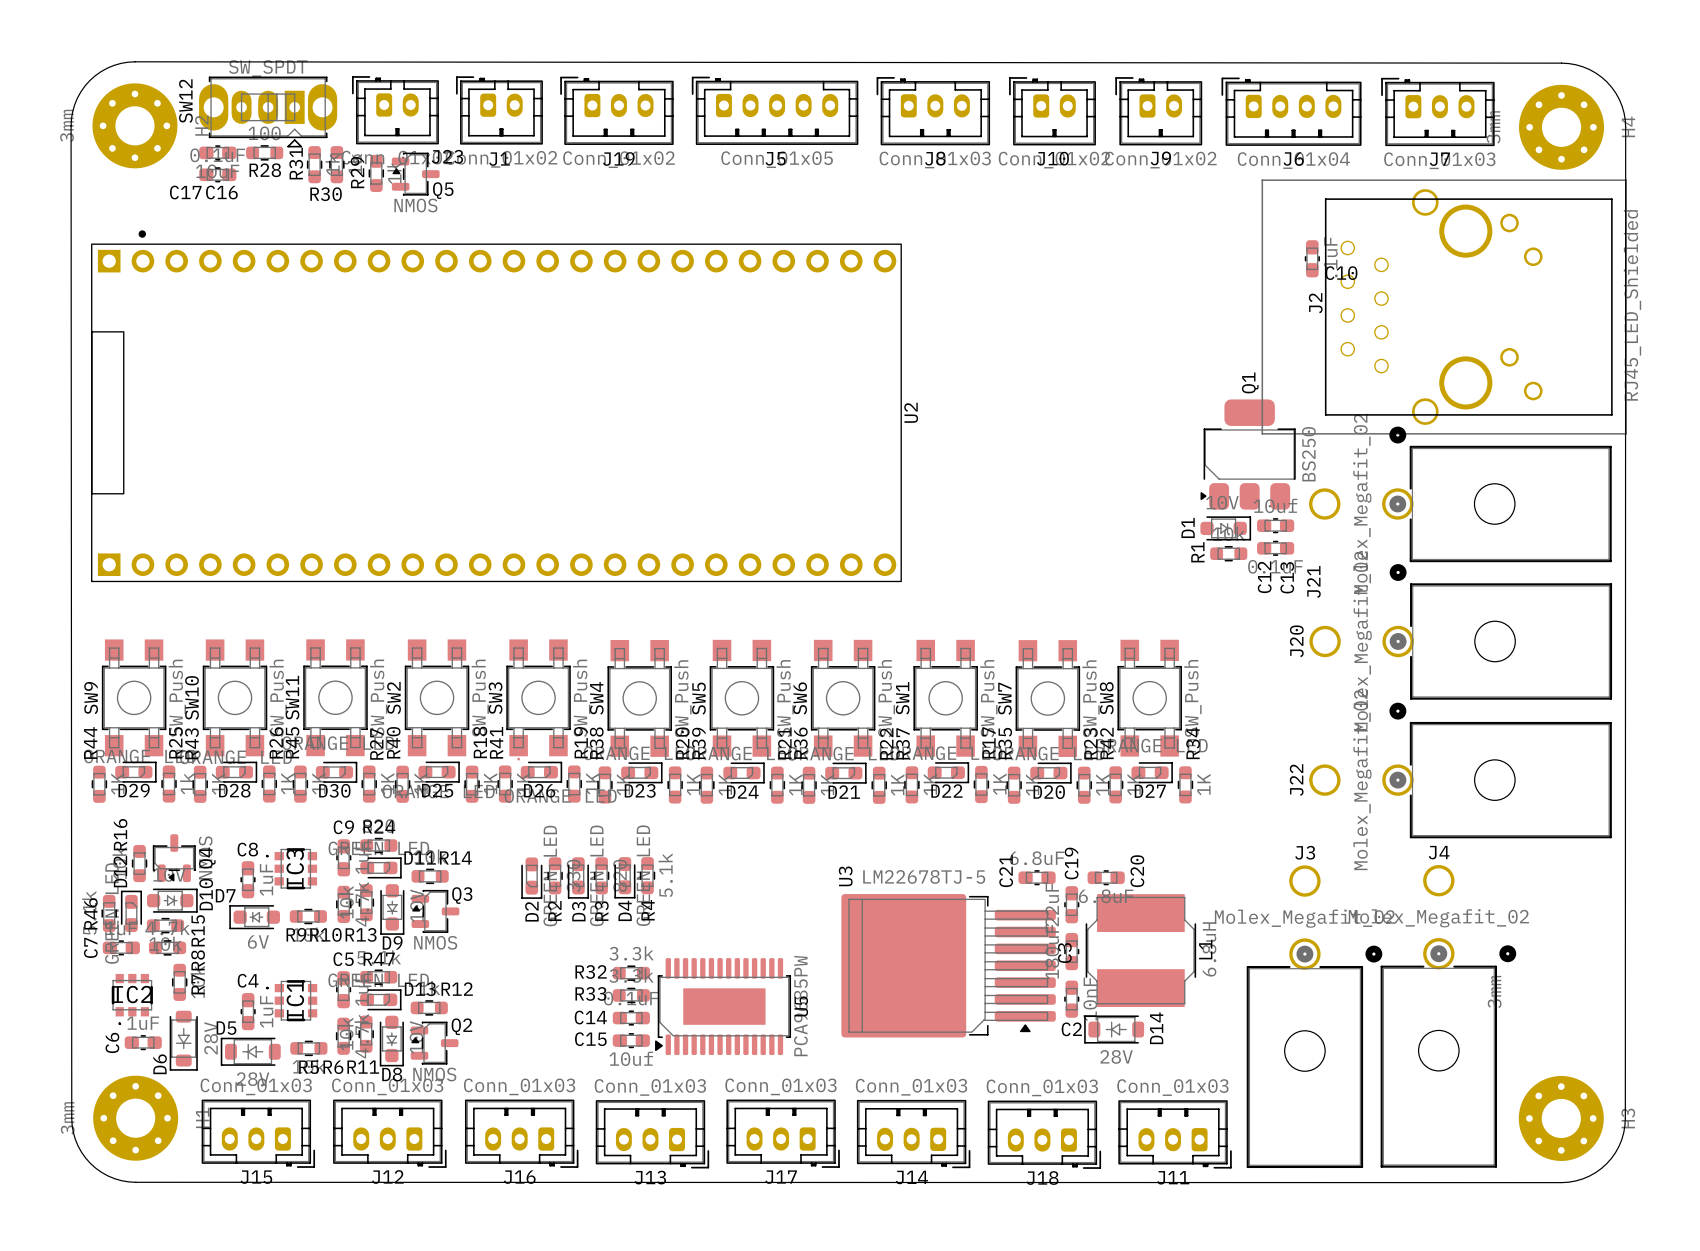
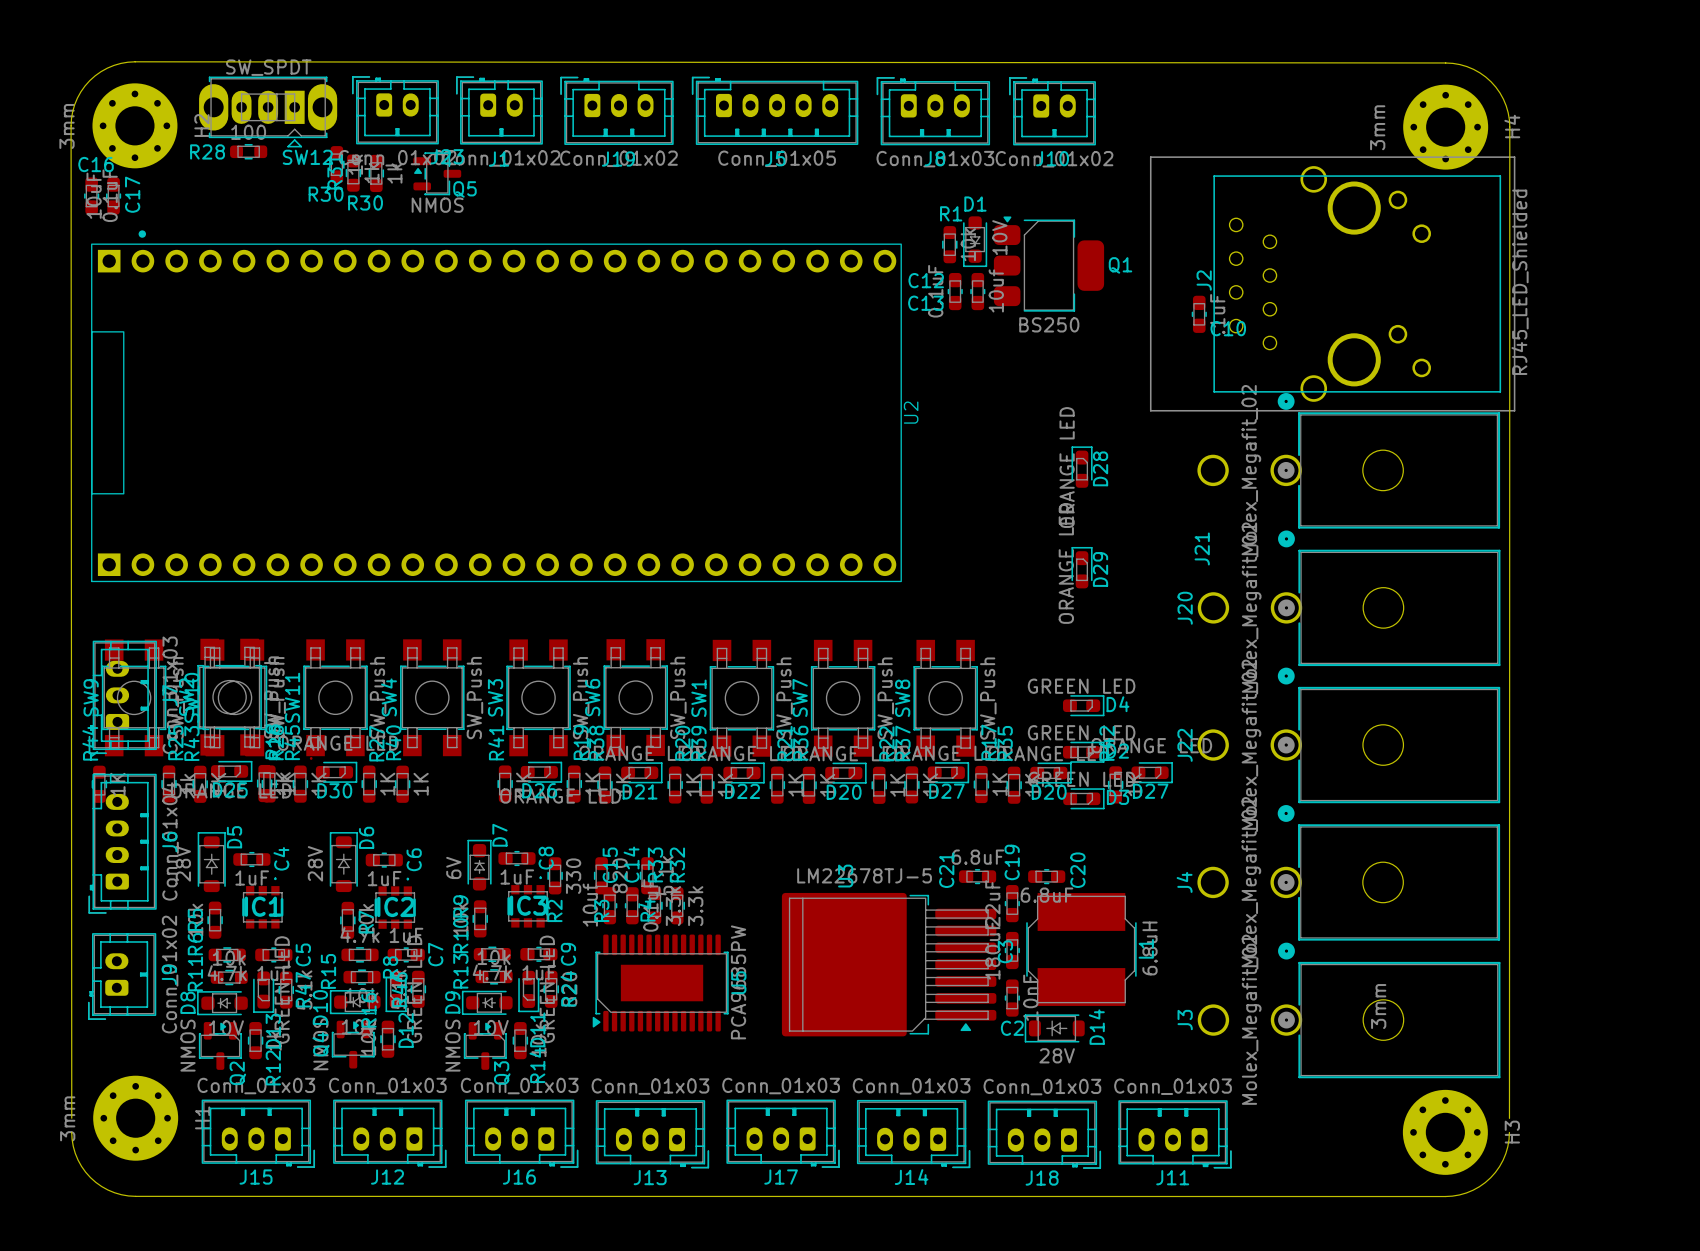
board edge: (135, 61) (1561, 63) (1582, 66) (1601, 77) (1611, 87) (1619, 99) (1624, 112) (1625, 127) (1624, 1125) (1618, 1146) (1611, 1158) (1601, 1168) (1582, 1179) (1561, 1182) (135, 1182) (114, 1178) (101, 1172) (90, 1163) (78, 1146) (73, 1132) (71, 1118) -> (135, 61) (1445, 62) (1466, 66) (1485, 76) (1495, 87) (1503, 99) (1508, 112) (1509, 127) (1509, 1118)
SW12 name rotation: 0° (185, 101) -> 90° clockwise (307, 157)
SW12 name position: SW12 (185, 101) -> SW12 (307, 157)
J9 rotation: 0° (1158, 111) -> 90° counterclockwise (122, 976)
J9 position: (1158, 111) -> (122, 976)
J6 rotation: 0° (1291, 111) -> 90° counterclockwise (122, 843)
J6 position: (1291, 111) -> (122, 843)
J7 rotation: 0° (1437, 111) -> 90° counterclockwise (122, 697)
J7 position: (1437, 111) -> (122, 697)
H4 position: (1561, 127) -> (1445, 127)
C17 rotation: 0° (217, 152) -> 90° clockwise (113, 196)
C17 position: (217, 152) -> (113, 196)
R28 position: (264, 152) -> (248, 151)
R31 position: (314, 164) -> (353, 173)
R28 name position: R28 (265, 170) -> R28 (207, 151)
R29 name: R29 (357, 172) -> R30 (365, 202)
C16 rotation: 0° (217, 174) -> 90° clockwise (91, 196)
C16 position: (217, 174) -> (91, 196)
Q5 position: (415, 174) -> (437, 173)
C17 name position: C17 (185, 192) -> C17 (132, 194)
C16 name position: C16 (221, 192) -> C16 (96, 164)
C10 position: (1312, 258) -> (1199, 314)
J2 position: (1444, 307) -> (1332, 283)
Q1 rotation: 0° (1248, 454) -> 90° clockwise (1048, 264)
Q1 position: (1248, 454) -> (1048, 264)
J21 position: (1460, 494) -> (1348, 460)
C13 rotation: 0° (1275, 525) -> 90° clockwise (977, 291)
C13 position: (1275, 525) -> (977, 291)
D1 rotation: 0° (1225, 528) -> 90° clockwise (975, 241)
D1 position: (1225, 528) -> (975, 241)
C12 rotation: 0° (1275, 548) -> 90° clockwise (955, 291)
C12 position: (1275, 548) -> (955, 291)
R1 rotation: 0° (1228, 553) -> 90° clockwise (949, 244)
R1 position: (1228, 553) -> (949, 244)
J20 position: (1460, 631) -> (1349, 598)
SW2 position: (437, 697) -> (229, 697)
SW6: none -> SW_Push (635, 697)
SW4 position: (639, 698) -> (432, 697)
SW5 name: SW5 (698, 698) -> SW1 (698, 698)
SW6 name: SW6 (800, 698) -> SW7 (800, 697)
SW1 name: SW1 (902, 698) -> SW8 (902, 698)
SW7: SW_Push (1047, 698) -> none
SW8: SW_Push (1149, 698) -> none
top track: (518, 758) (518, 759) -> (311, 758) (311, 758)
J22 position: (1460, 770) -> (1348, 735)
D29 rotation: 0° (135, 772) -> 90° counterclockwise (1082, 567)
D29 position: (135, 772) -> (1082, 567)
D28 rotation: 0° (236, 772) -> 90° counterclockwise (1082, 467)
D28 position: (236, 772) -> (1082, 467)
D25 position: (439, 772) -> (231, 771)
R18 position: (472, 784) -> (264, 783)
R34: 1K (1185, 784) -> none
R23: 1K (1084, 785) -> none
D23 name: D23 (640, 790) -> D21 (640, 791)
D24 name: D24 (742, 791) -> D22 (742, 791)
D22 name: D22 (946, 791) -> D27 (946, 791)
D21 name: D21 (844, 792) -> D20 (844, 792)
R24 rotation: 0° (378, 845) -> 90° clockwise (551, 989)
R24 position: (378, 845) -> (551, 989)
C9 rotation: 0° (343, 857) -> 90° clockwise (538, 954)
C9 position: (343, 857) -> (538, 954)
Q4 rotation: 0° (174, 858) -> 180° (353, 1044)
Q4 position: (174, 858) -> (353, 1044)
R16 position: (139, 863) -> (388, 1039)
D11 rotation: 0° (381, 867) -> 90° clockwise (528, 991)
D11 position: (381, 867) -> (528, 991)
IC3 rotation: 0° (291, 868) -> 90° clockwise (527, 902)
IC3 position: (291, 868) -> (527, 902)
R14 rotation: 0° (430, 876) -> 90° clockwise (520, 1040)
R14 position: (430, 876) -> (520, 1040)
D3 rotation: 0° (578, 877) -> 90° counterclockwise (1083, 798)
D3 position: (578, 877) -> (1083, 798)
D4 rotation: 0° (624, 877) -> 90° counterclockwise (1083, 705)
D4 position: (624, 877) -> (1083, 705)
C21 position: (1037, 877) -> (977, 876)
C20 position: (1106, 877) -> (1046, 876)
D2 rotation: 0° (531, 878) -> 90° counterclockwise (1083, 752)
D2 position: (531, 878) -> (1083, 752)
C8 rotation: 0° (248, 879) -> 90° clockwise (516, 858)
C8 position: (248, 879) -> (516, 858)
D10 rotation: 0° (172, 900) -> 180° (355, 1002)
D10 position: (172, 900) -> (355, 1002)
R13 rotation: 0° (366, 902) -> 90° clockwise (494, 976)
R13 position: (366, 902) -> (494, 976)
R10 rotation: 0° (343, 904) -> 90° clockwise (492, 954)
R10 position: (343, 904) -> (492, 954)
C19 position: (1071, 904) -> (1012, 903)
D9 rotation: 0° (392, 909) -> 90° clockwise (487, 1002)
D9 position: (392, 909) -> (487, 1002)
D12 rotation: 0° (131, 911) -> 180° (396, 991)
D12 position: (131, 911) -> (396, 991)
Q3 rotation: 0° (435, 911) -> 90° clockwise (485, 1045)
Q3 position: (435, 911) -> (485, 1045)
R46 position: (109, 913) -> (418, 989)
R9 rotation: 0° (308, 916) -> 90° clockwise (480, 918)
R9 position: (308, 916) -> (480, 918)
D7 rotation: 0° (254, 917) -> 90° clockwise (479, 865)
D7 position: (254, 917) -> (479, 865)
R15 position: (165, 925) -> (362, 977)
R15 name position: R15 (198, 930) -> R15 (328, 971)
C7 name position: C7 (90, 947) -> C7 (435, 954)
C7 position: (121, 947) -> (406, 954)
R8 position: (167, 947) -> (360, 954)
L1 position: (1140, 950) -> (1081, 949)
C3 position: (1071, 951) -> (1012, 950)
U3 position: (948, 965) -> (889, 964)
R32 rotation: 0° (631, 973) -> 90° clockwise (677, 905)
R32 position: (631, 973) -> (677, 905)
R47 rotation: 0° (378, 977) -> 90° clockwise (286, 990)
R47 position: (378, 977) -> (286, 990)
R7 position: (179, 982) -> (347, 920)
C5 rotation: 0° (343, 989) -> 90° clockwise (273, 954)
C5 position: (343, 989) -> (273, 954)
R33 rotation: 0° (631, 995) -> 90° clockwise (654, 905)
R33 position: (631, 995) -> (654, 905)
IC2 rotation: 0° (132, 999) -> 180° (395, 903)
IC2 position: (132, 999) -> (395, 903)
D13 rotation: 0° (380, 999) -> 90° clockwise (263, 992)
D13 position: (380, 999) -> (263, 992)
C2 position: (1071, 999) -> (1012, 998)
IC1 rotation: 0° (291, 1000) -> 90° clockwise (262, 903)
IC1 position: (291, 1000) -> (262, 903)
U5 position: (723, 1006) -> (660, 983)
R12 rotation: 0° (429, 1007) -> 90° clockwise (255, 1040)
R12 position: (429, 1007) -> (255, 1040)
C4 rotation: 0° (248, 1011) -> 90° clockwise (251, 859)
C4 position: (248, 1011) -> (251, 859)
J3 rotation: 0° (1314, 1016) -> 90° counterclockwise (1349, 1010)
J4 rotation: 0° (1448, 1016) -> 90° counterclockwise (1348, 872)
C14 rotation: 0° (631, 1018) -> 90° clockwise (632, 905)
C14 position: (631, 1018) -> (632, 905)
C6 value position: 1uF (143, 1023) -> 1uF (384, 878)
D14 position: (1114, 1029) -> (1054, 1028)
R11 rotation: 0° (366, 1034) -> 90° clockwise (229, 977)
R11 position: (366, 1034) -> (229, 977)
R6 rotation: 0° (343, 1036) -> 90° clockwise (227, 954)
R6 position: (343, 1036) -> (227, 954)
D6 rotation: 0° (183, 1040) -> 180° (343, 862)
D6 position: (183, 1040) -> (343, 862)
C15 rotation: 0° (631, 1040) -> 90° clockwise (609, 905)
C15 position: (631, 1040) -> (609, 905)
D8 rotation: 0° (391, 1041) -> 90° clockwise (222, 1003)
D8 position: (391, 1041) -> (222, 1003)
C6 name position: C6 (112, 1042) -> C6 (414, 859)
C6 position: (143, 1042) -> (384, 860)
Q2 rotation: 0° (434, 1043) -> 90° clockwise (220, 1045)
Q2 position: (434, 1043) -> (220, 1045)
R5 rotation: 0° (308, 1048) -> 90° clockwise (215, 920)
R5 position: (308, 1048) -> (215, 920)
D5 rotation: 0° (250, 1051) -> 90° clockwise (211, 862)
D5 position: (250, 1051) -> (211, 862)
H3 position: (1561, 1118) -> (1445, 1132)
board edge: none -> (71, 1132) (75, 1153) (81, 1166) (90, 1177) (107, 1190) (121, 1194) (135, 1196) (1445, 1196) (1459, 1194) (1473, 1190) (1490, 1177) (1499, 1166) (1505, 1153) (1509, 1132)

